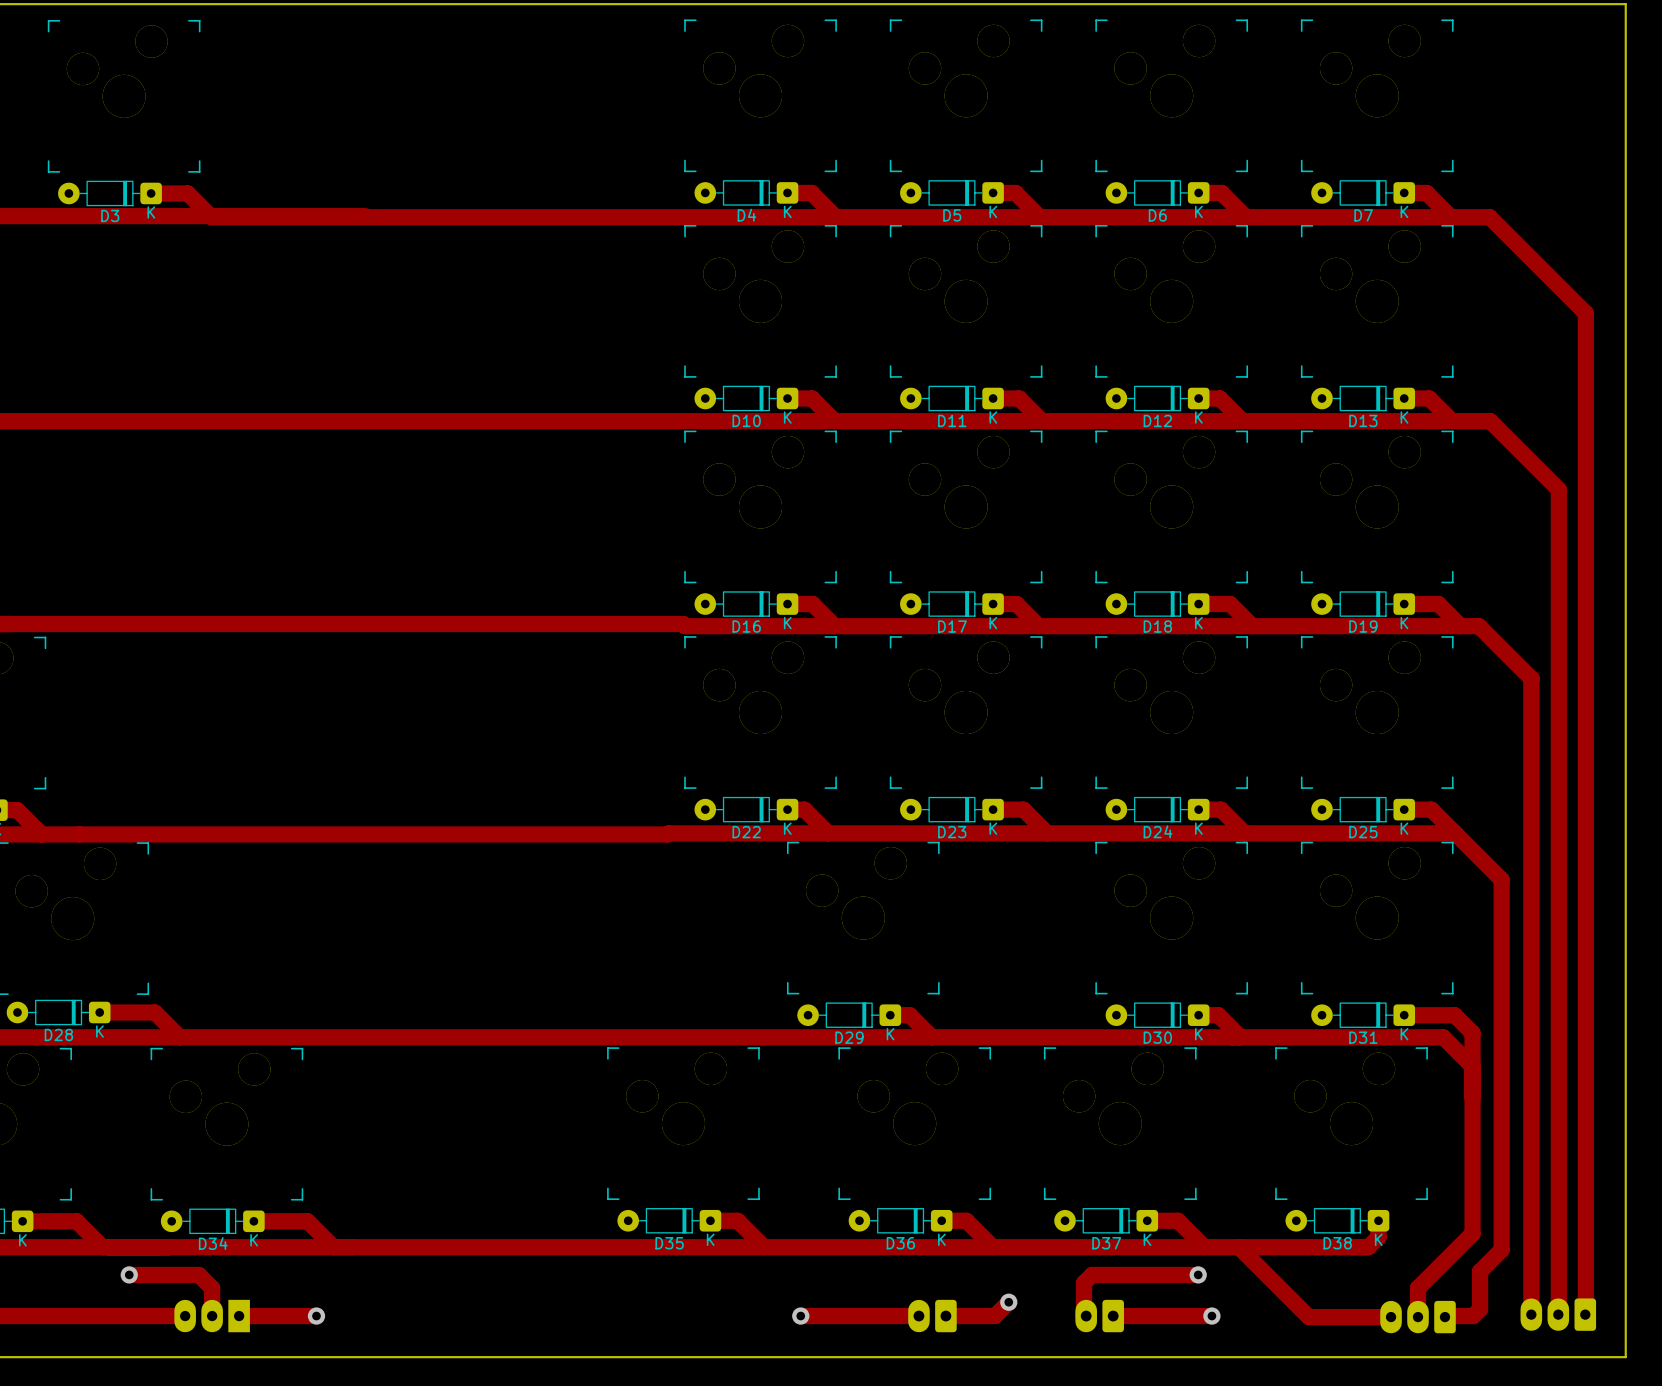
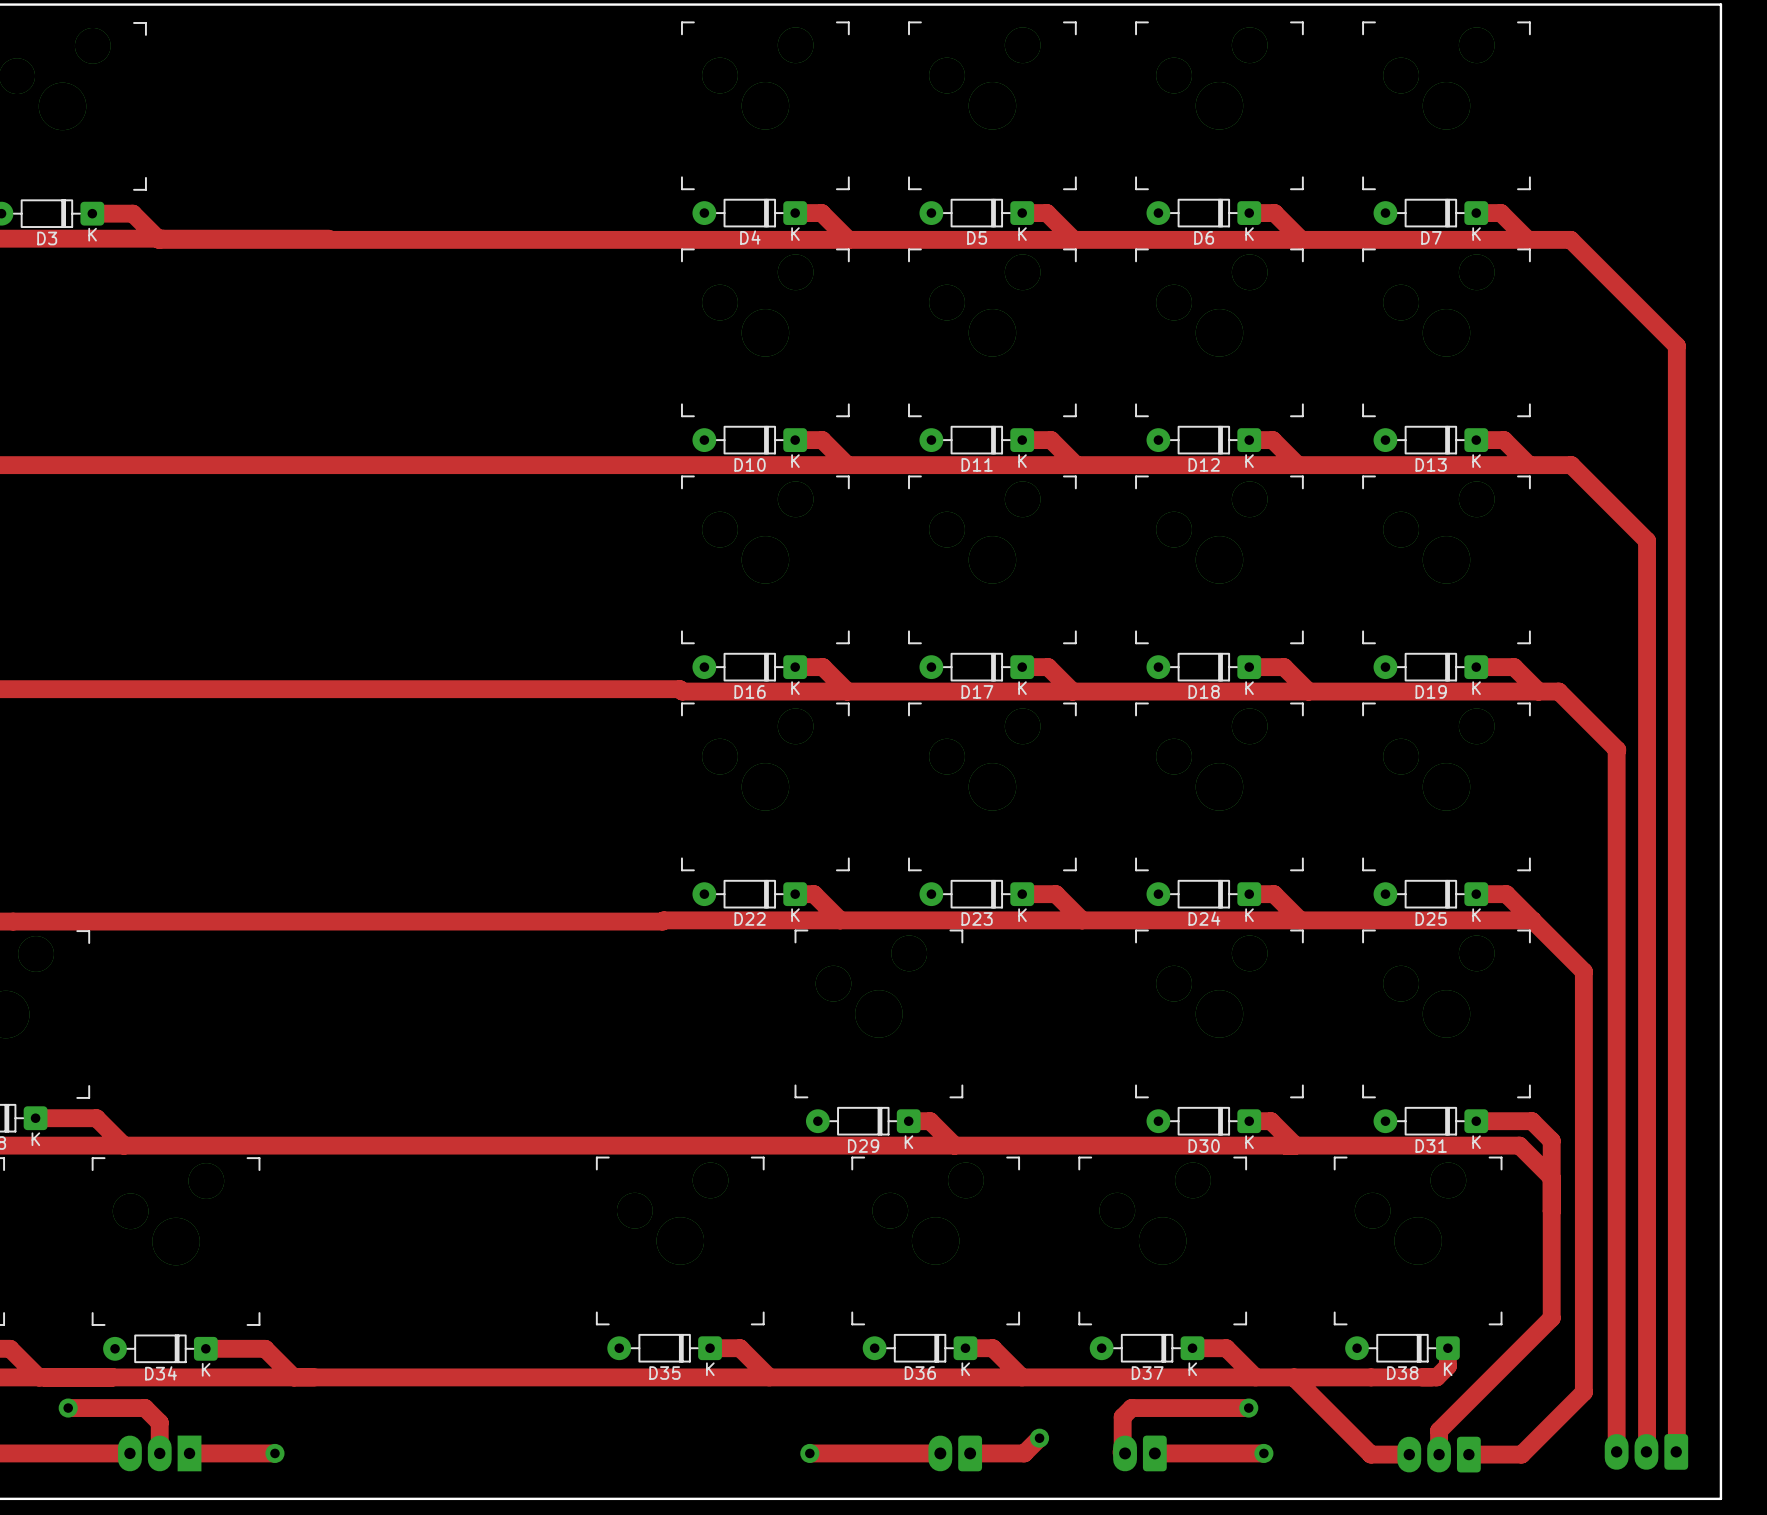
track: (1472, 1193) (1472, 1233) (1418, 1288) (1418, 1317) -> (1551, 1318) (1439, 1430) (1439, 1454)
track: (1501, 1249) (1480, 1271) (1480, 1309) (1473, 1316) (1444, 1316) -> (1583, 1380) (1583, 1392) (1521, 1454) (1468, 1454)
track: (1343, 1317) (1391, 1317) -> none
part position: (1418, 1317) -> (1439, 1454)

